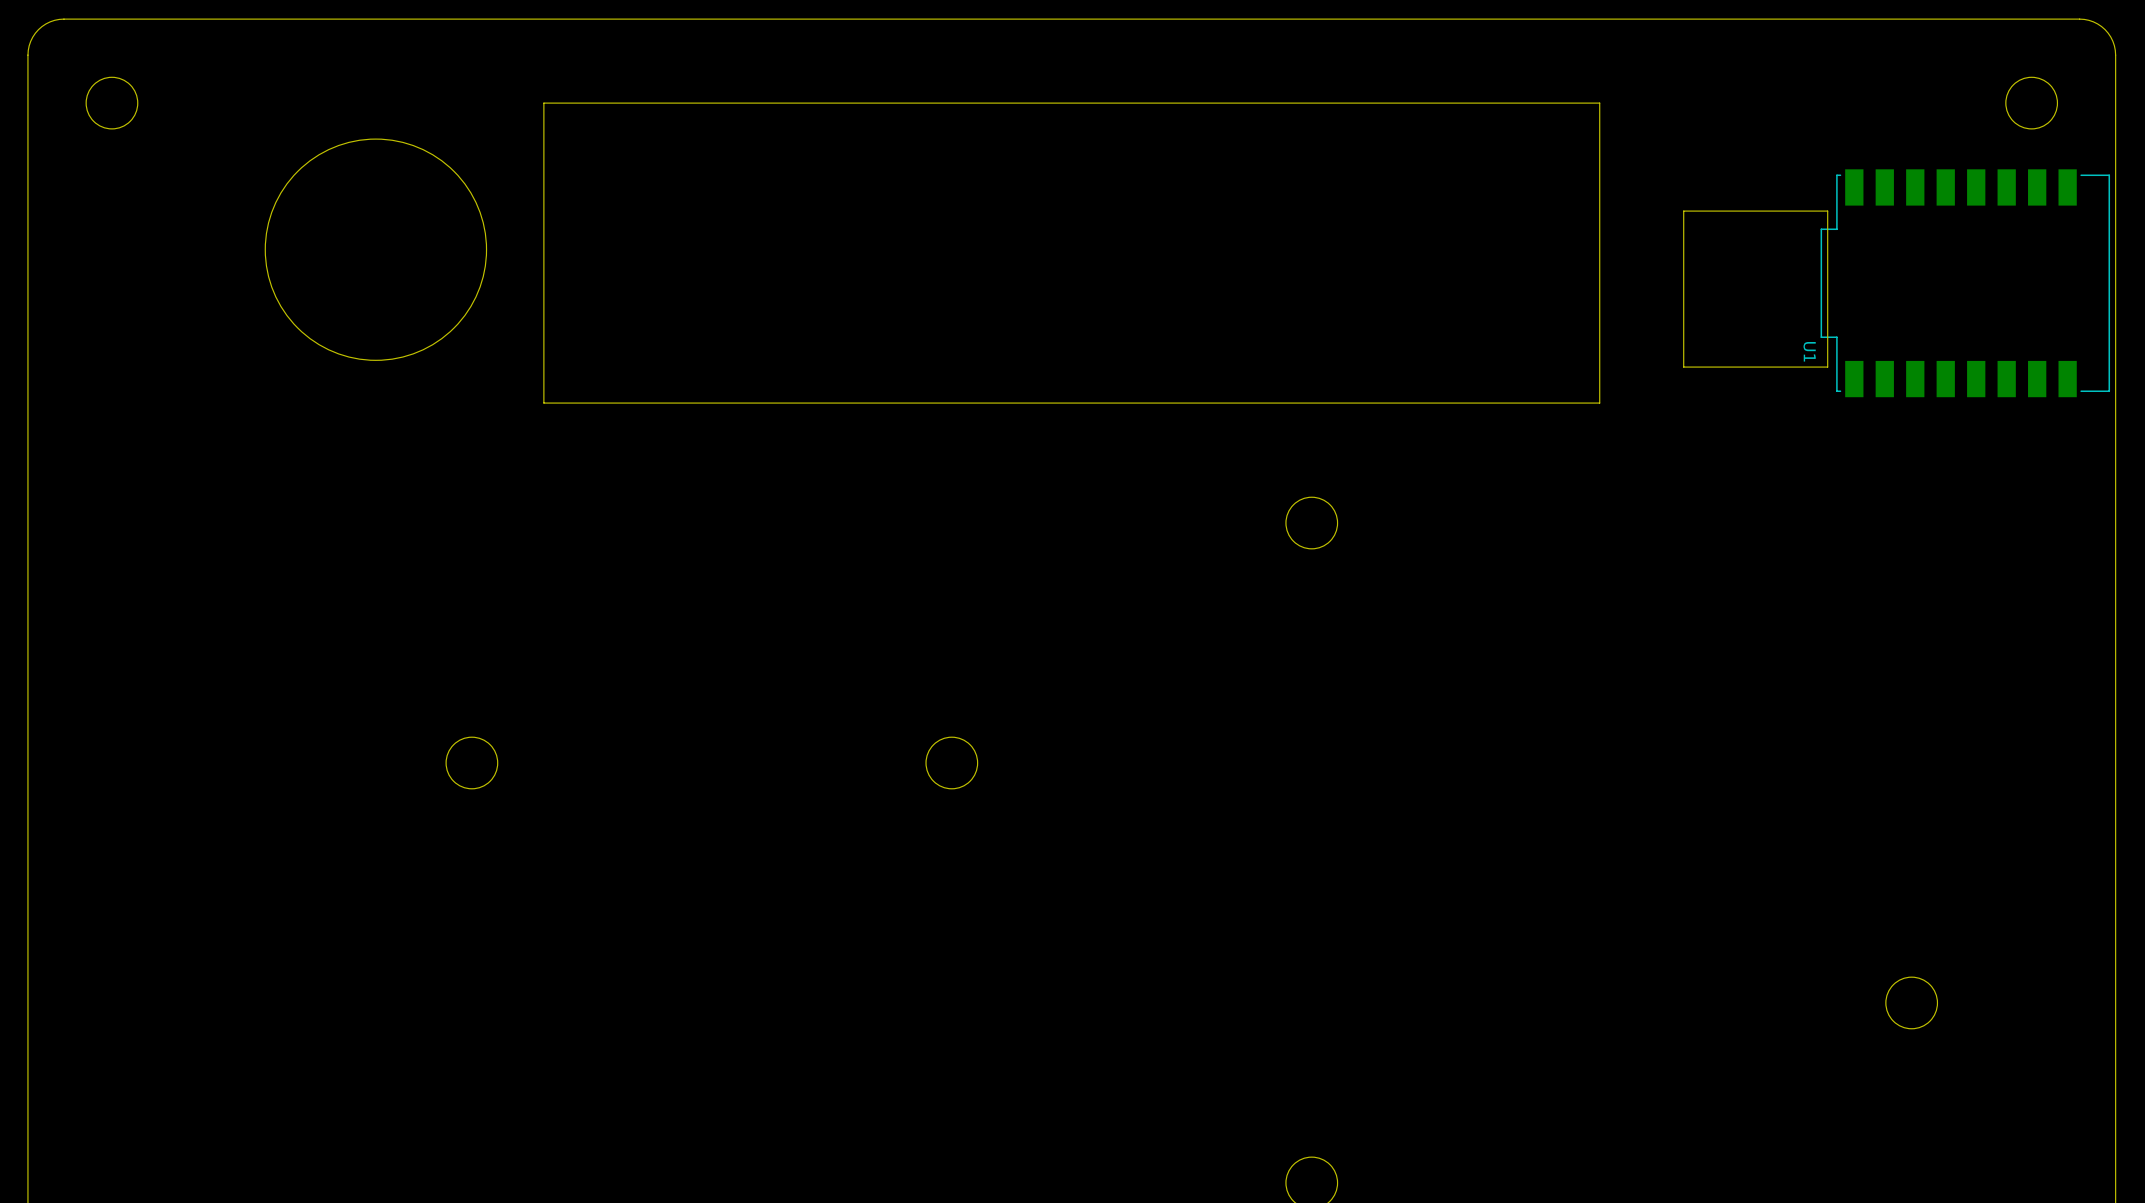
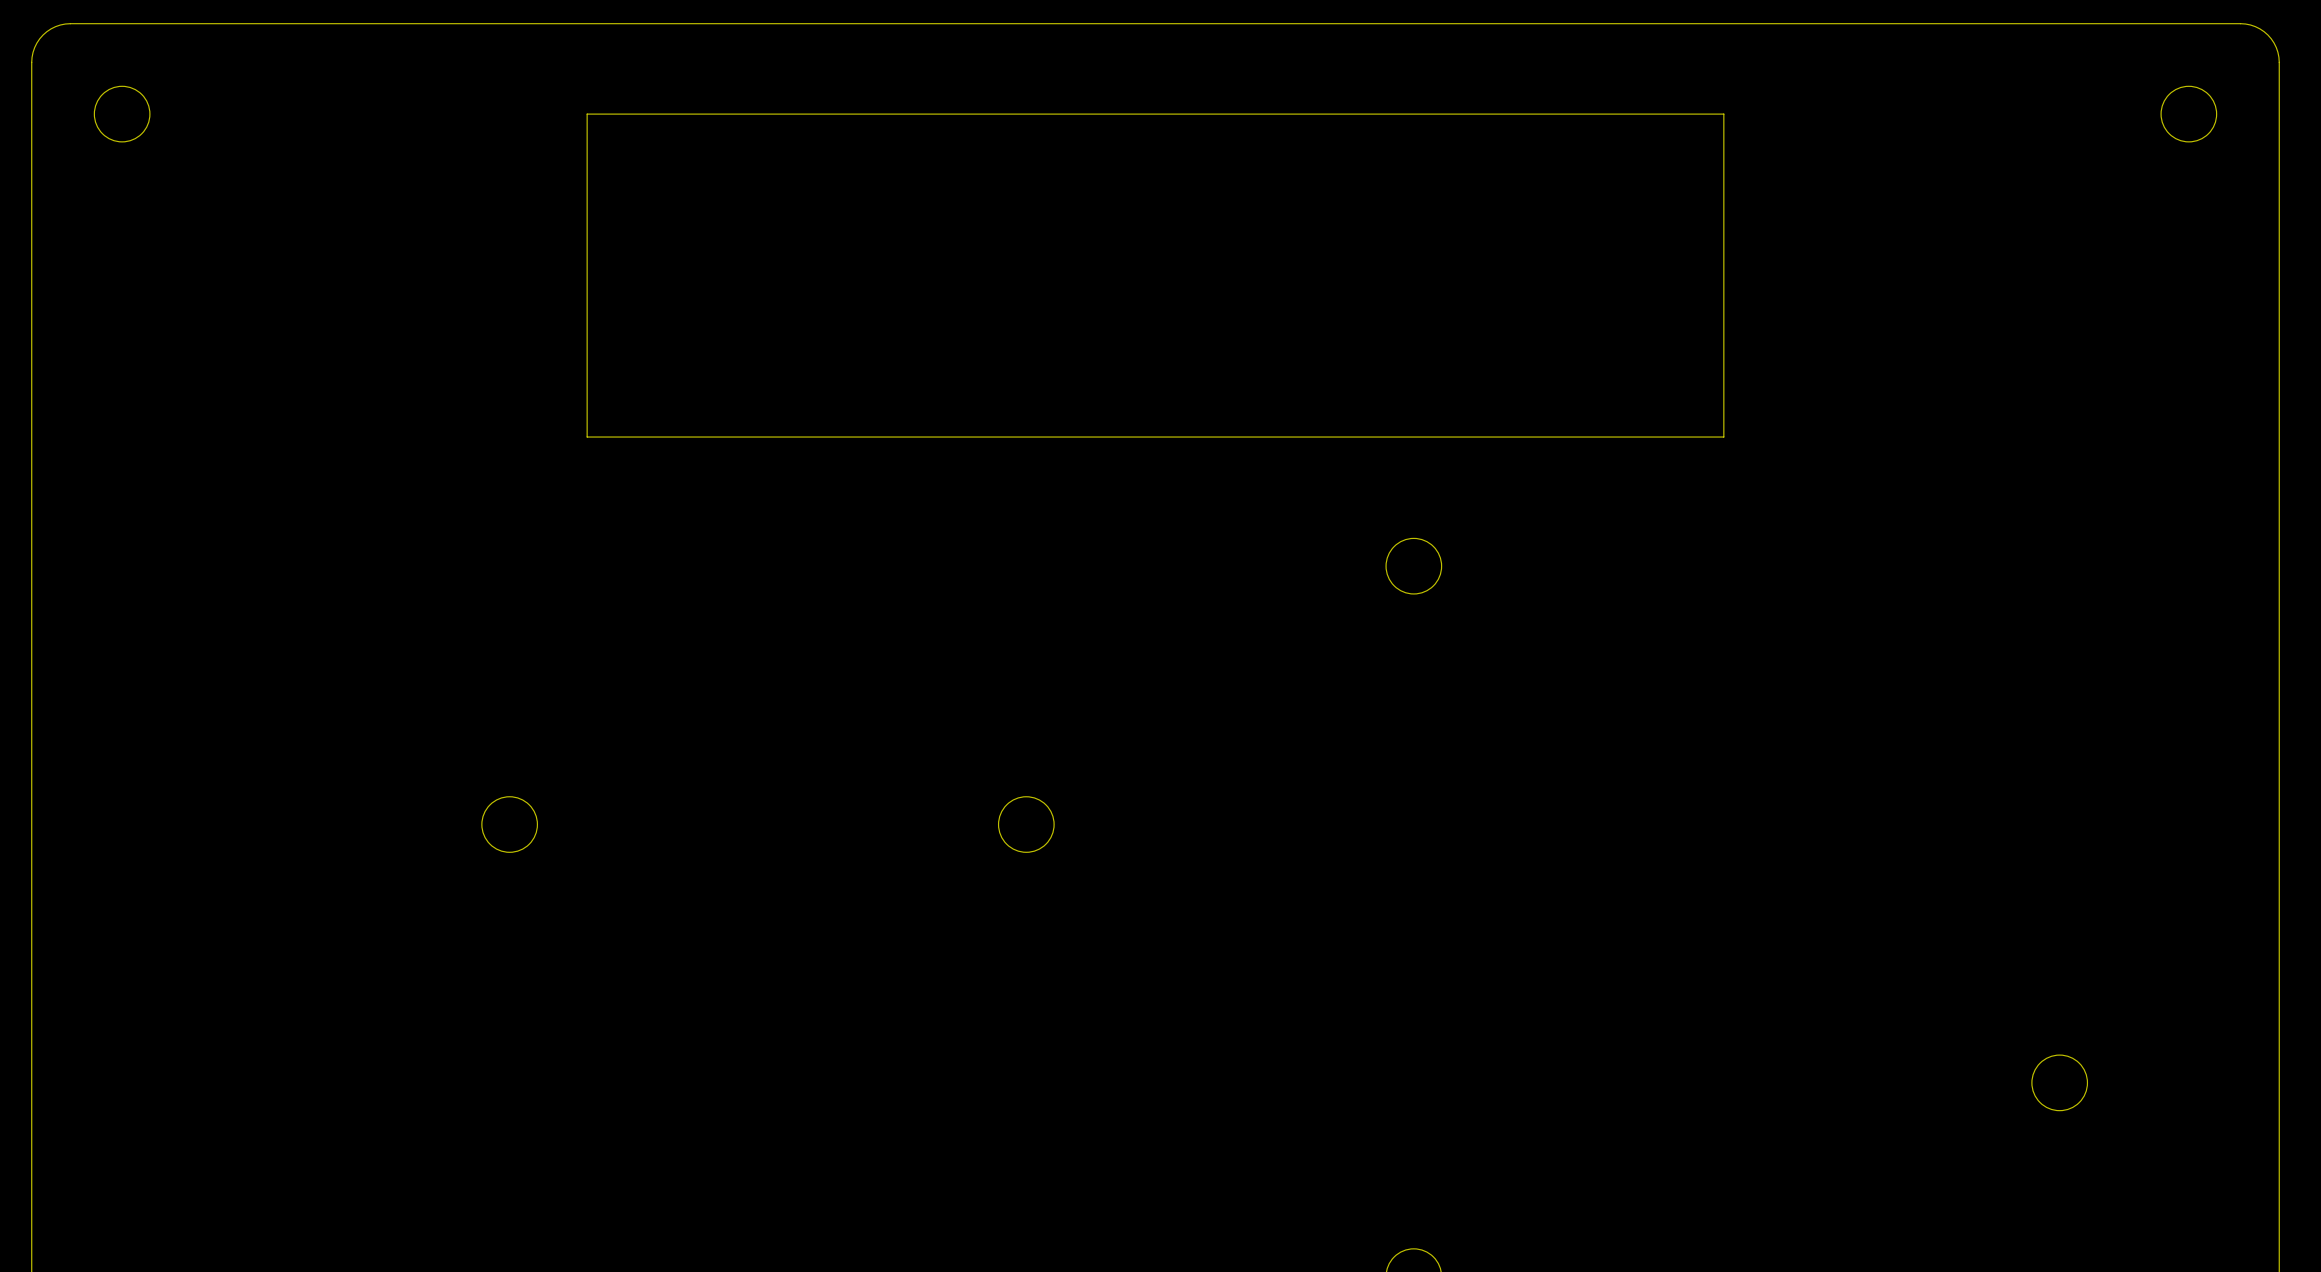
round board edge: [264, 138, 487, 361] -> none
board edge: (1827, 211) (1683, 211) (1683, 367) (1827, 367) (1827, 211) -> none
U1: (1965, 283) -> none

